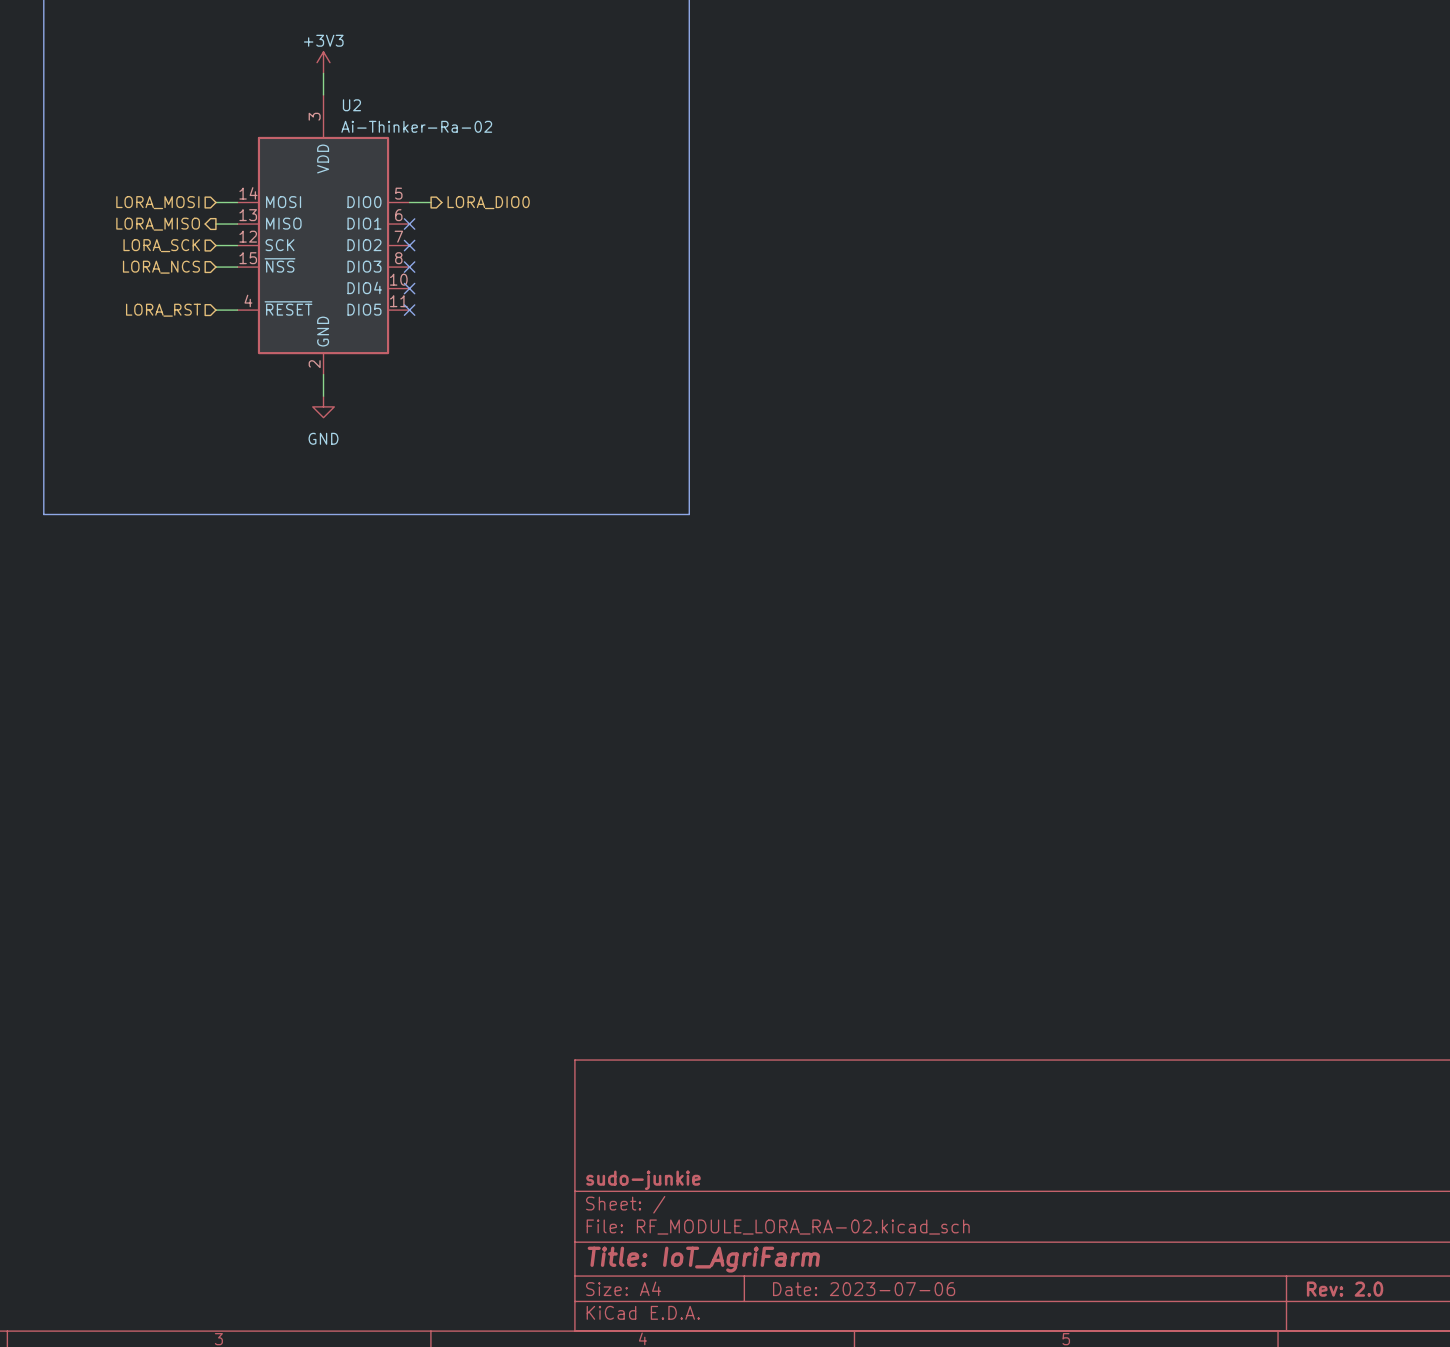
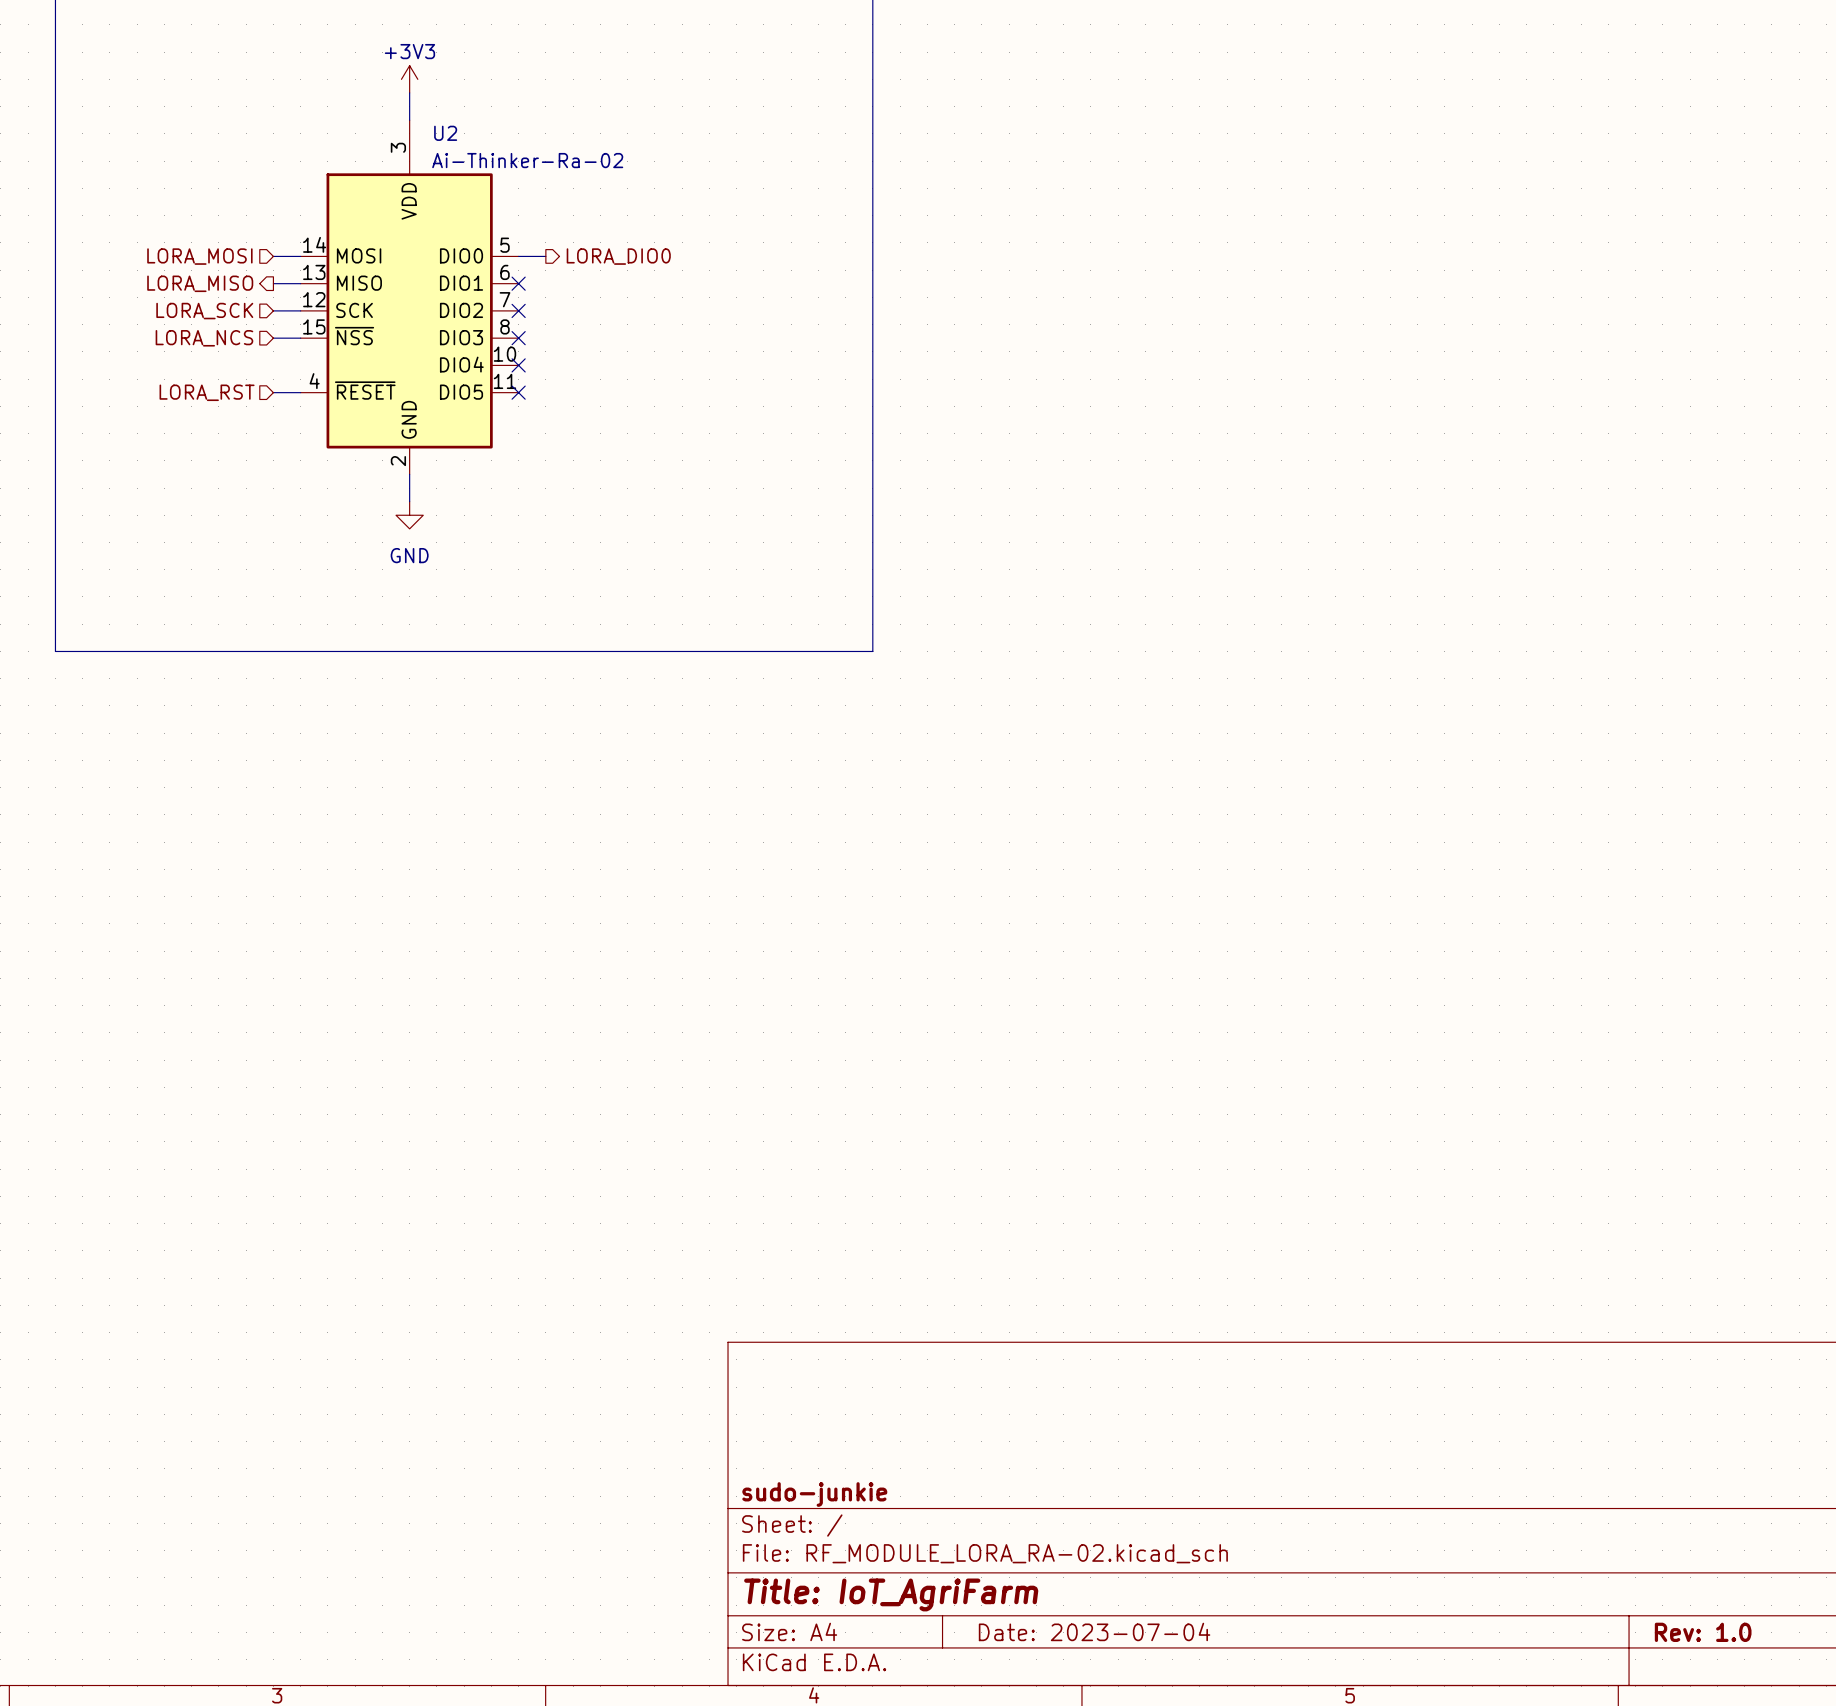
title block: Date: 2023-07-06 (864, 1289) -> Date: 2023-07-04 (1094, 1631)
title block: Rev: 2.0 (1345, 1289) -> Rev: 1.0 (1703, 1632)

